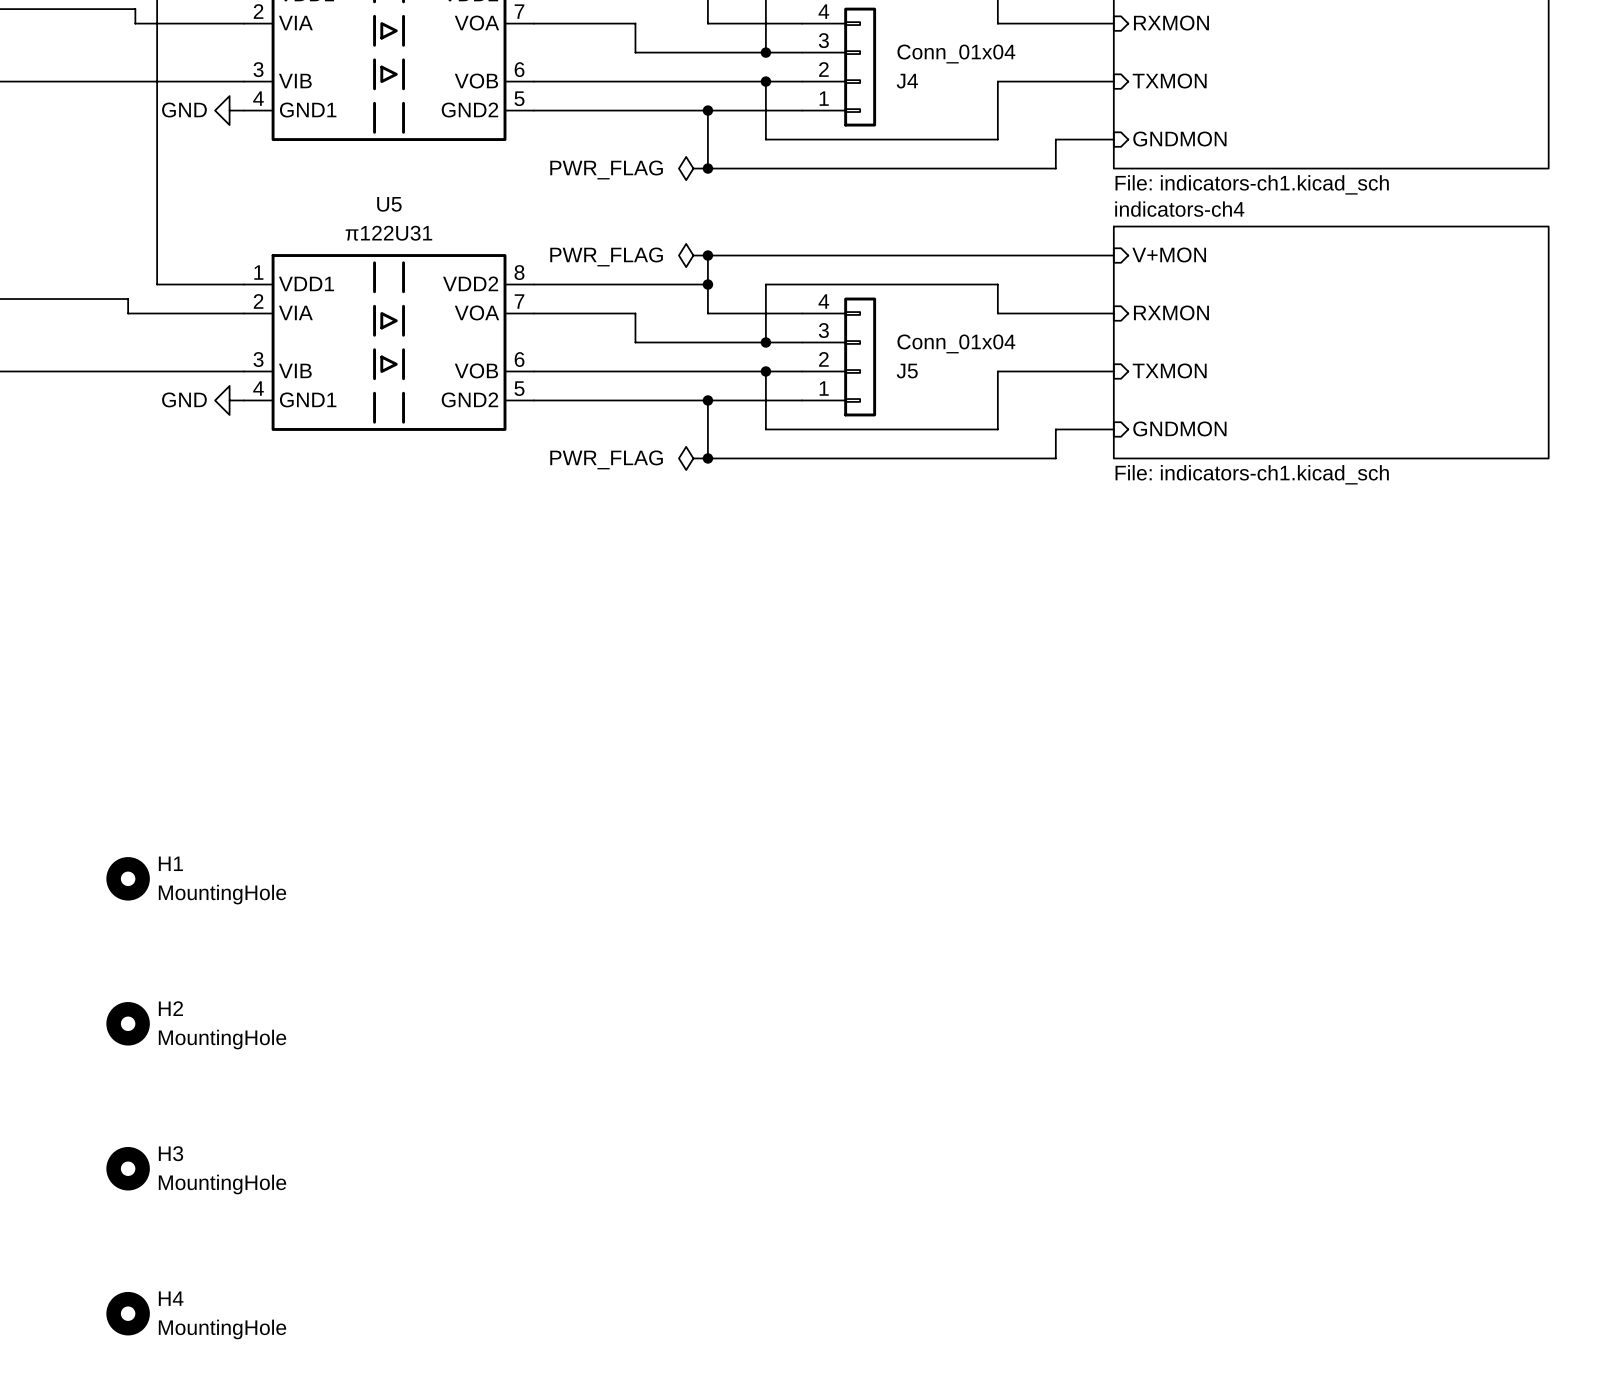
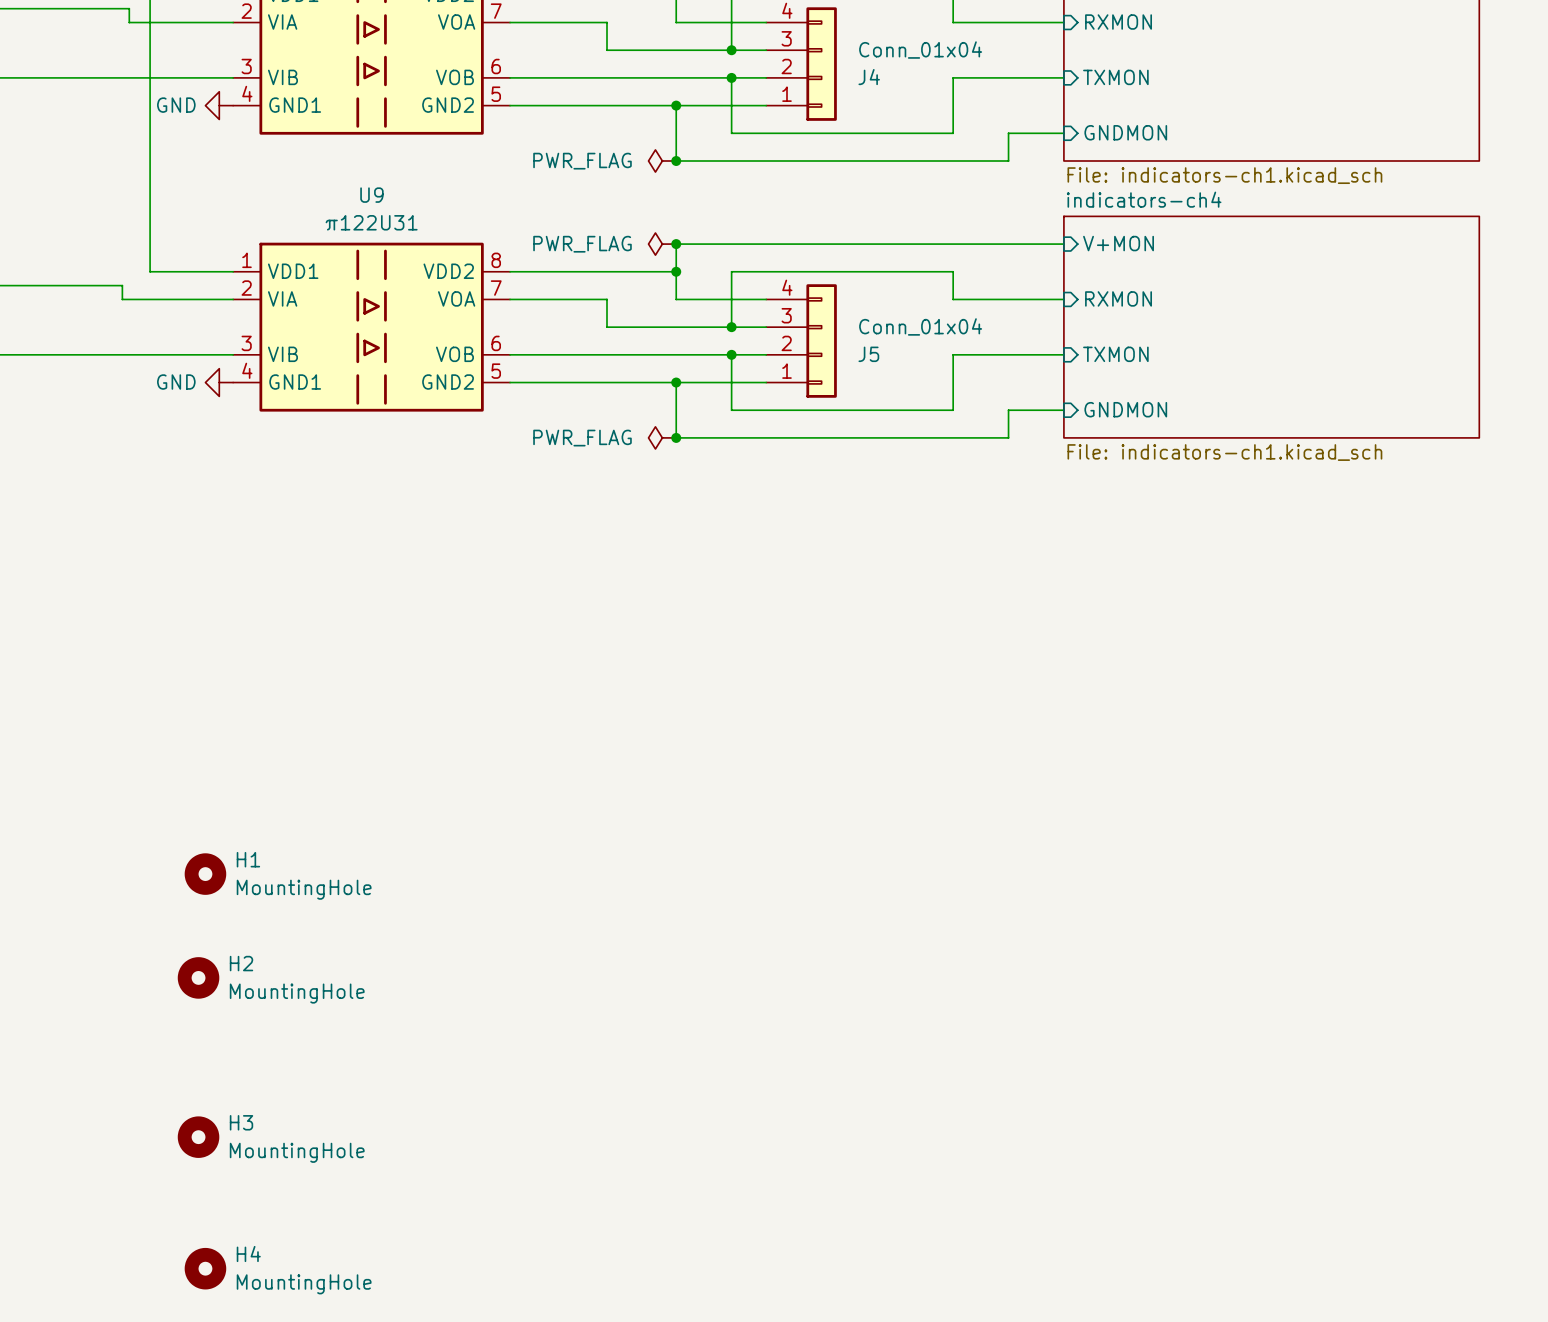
U5 name: U5 (389, 204) -> U9 (371, 195)
H1 position: (128, 878) -> (205, 874)
H2 position: (128, 1023) -> (198, 977)
H3 position: (128, 1168) -> (198, 1137)
H4 position: (128, 1313) -> (205, 1268)

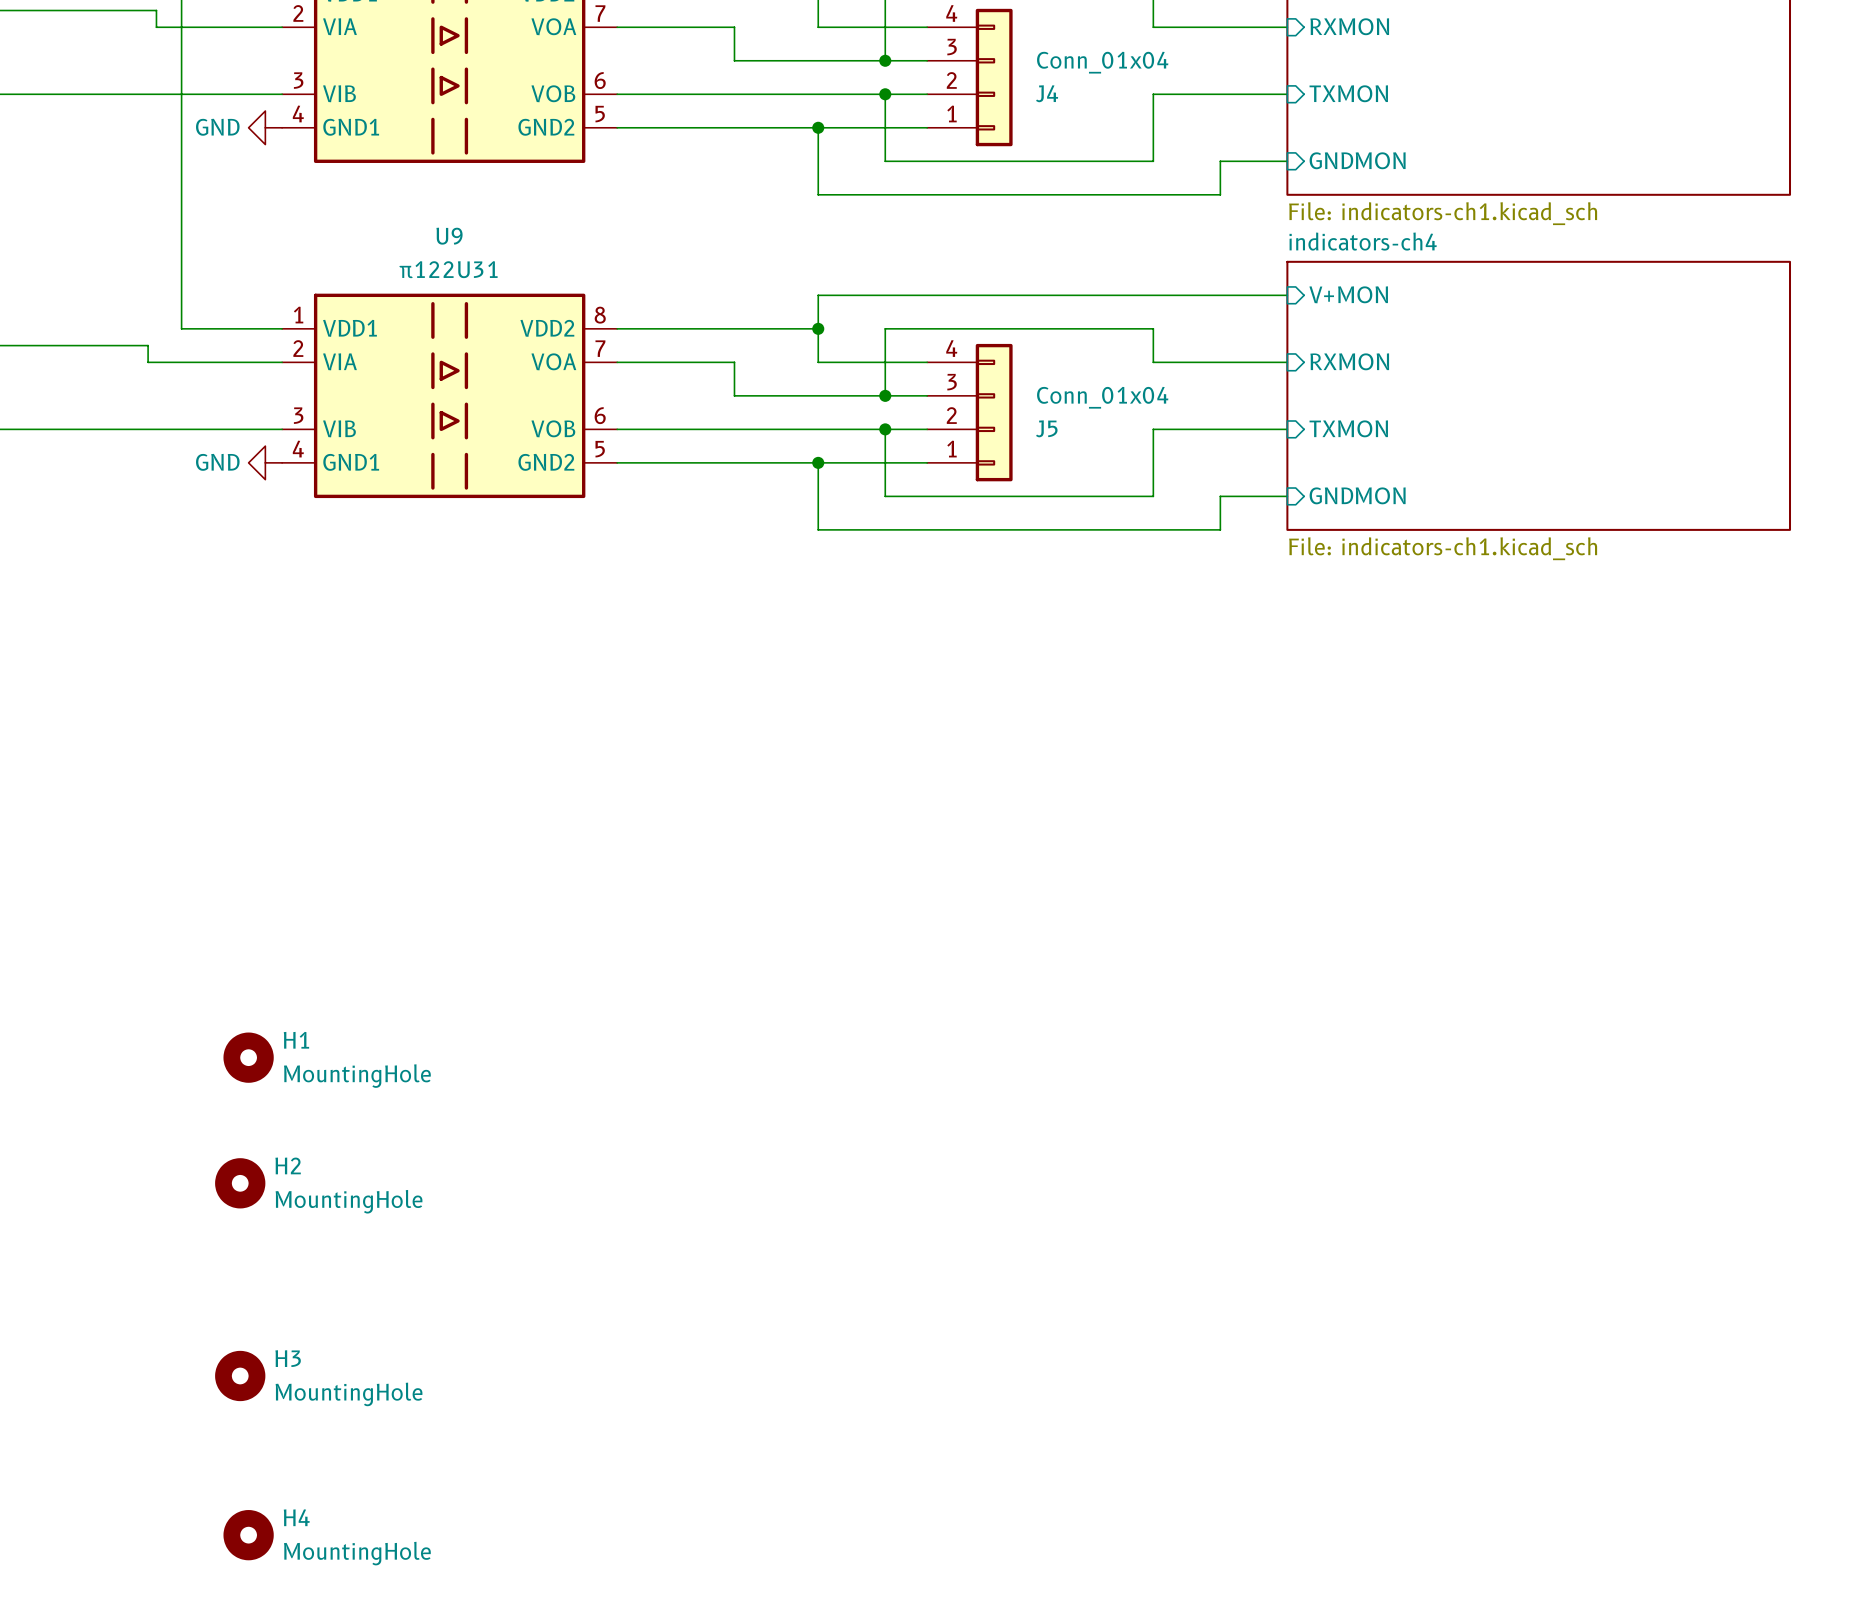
power symbol: PWR_FLAG (662, 160) -> none
junction: (676, 160) -> none
power symbol: PWR_FLAG (662, 244) -> none
junction: (676, 244) -> none
power symbol: PWR_FLAG (662, 437) -> none
junction: (676, 437) -> none

